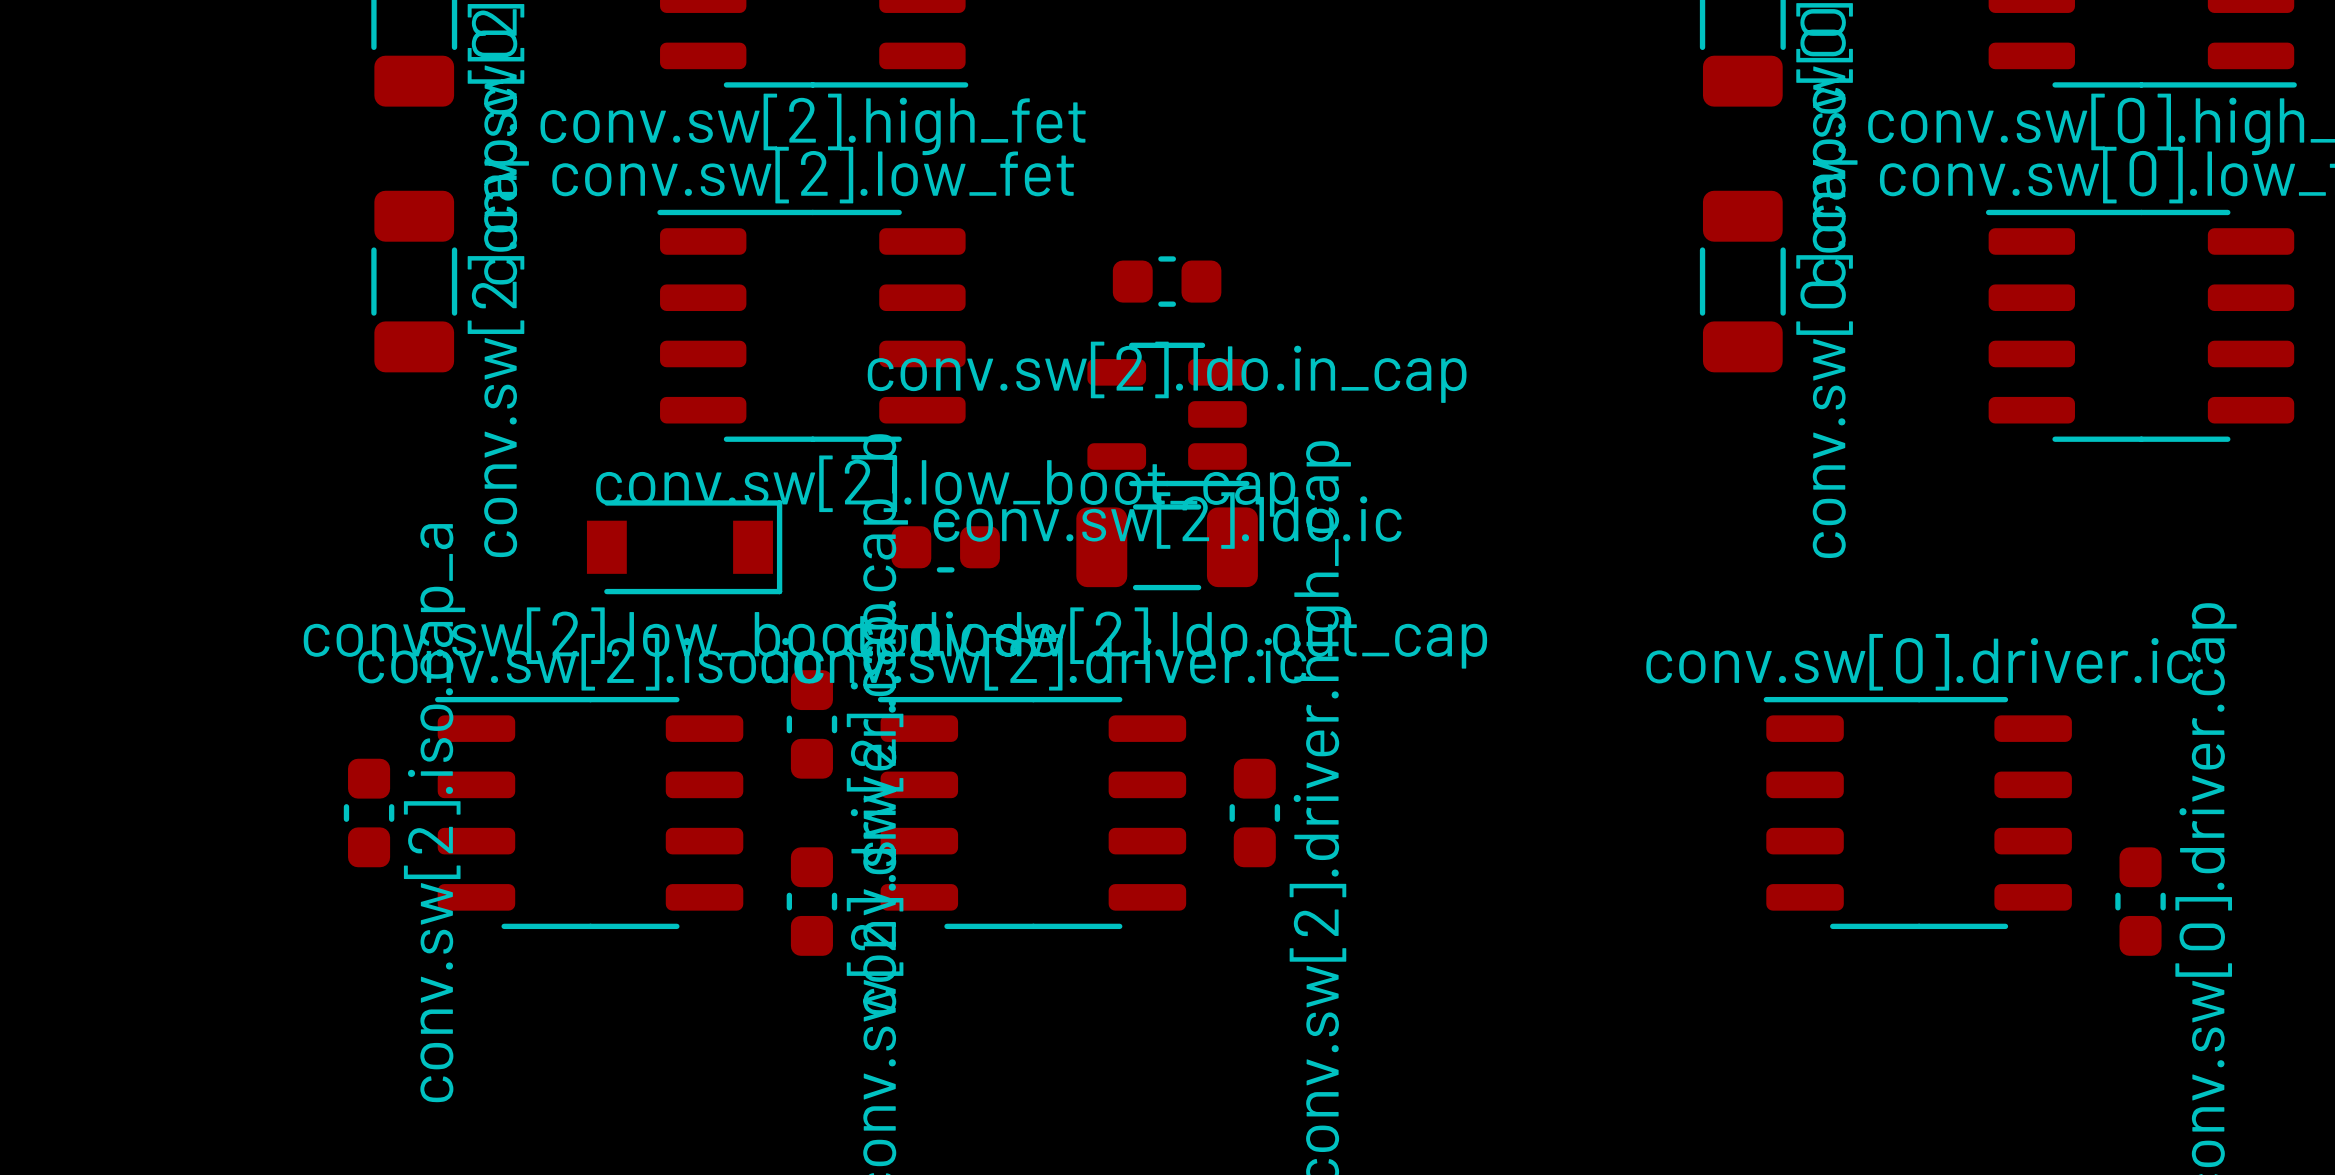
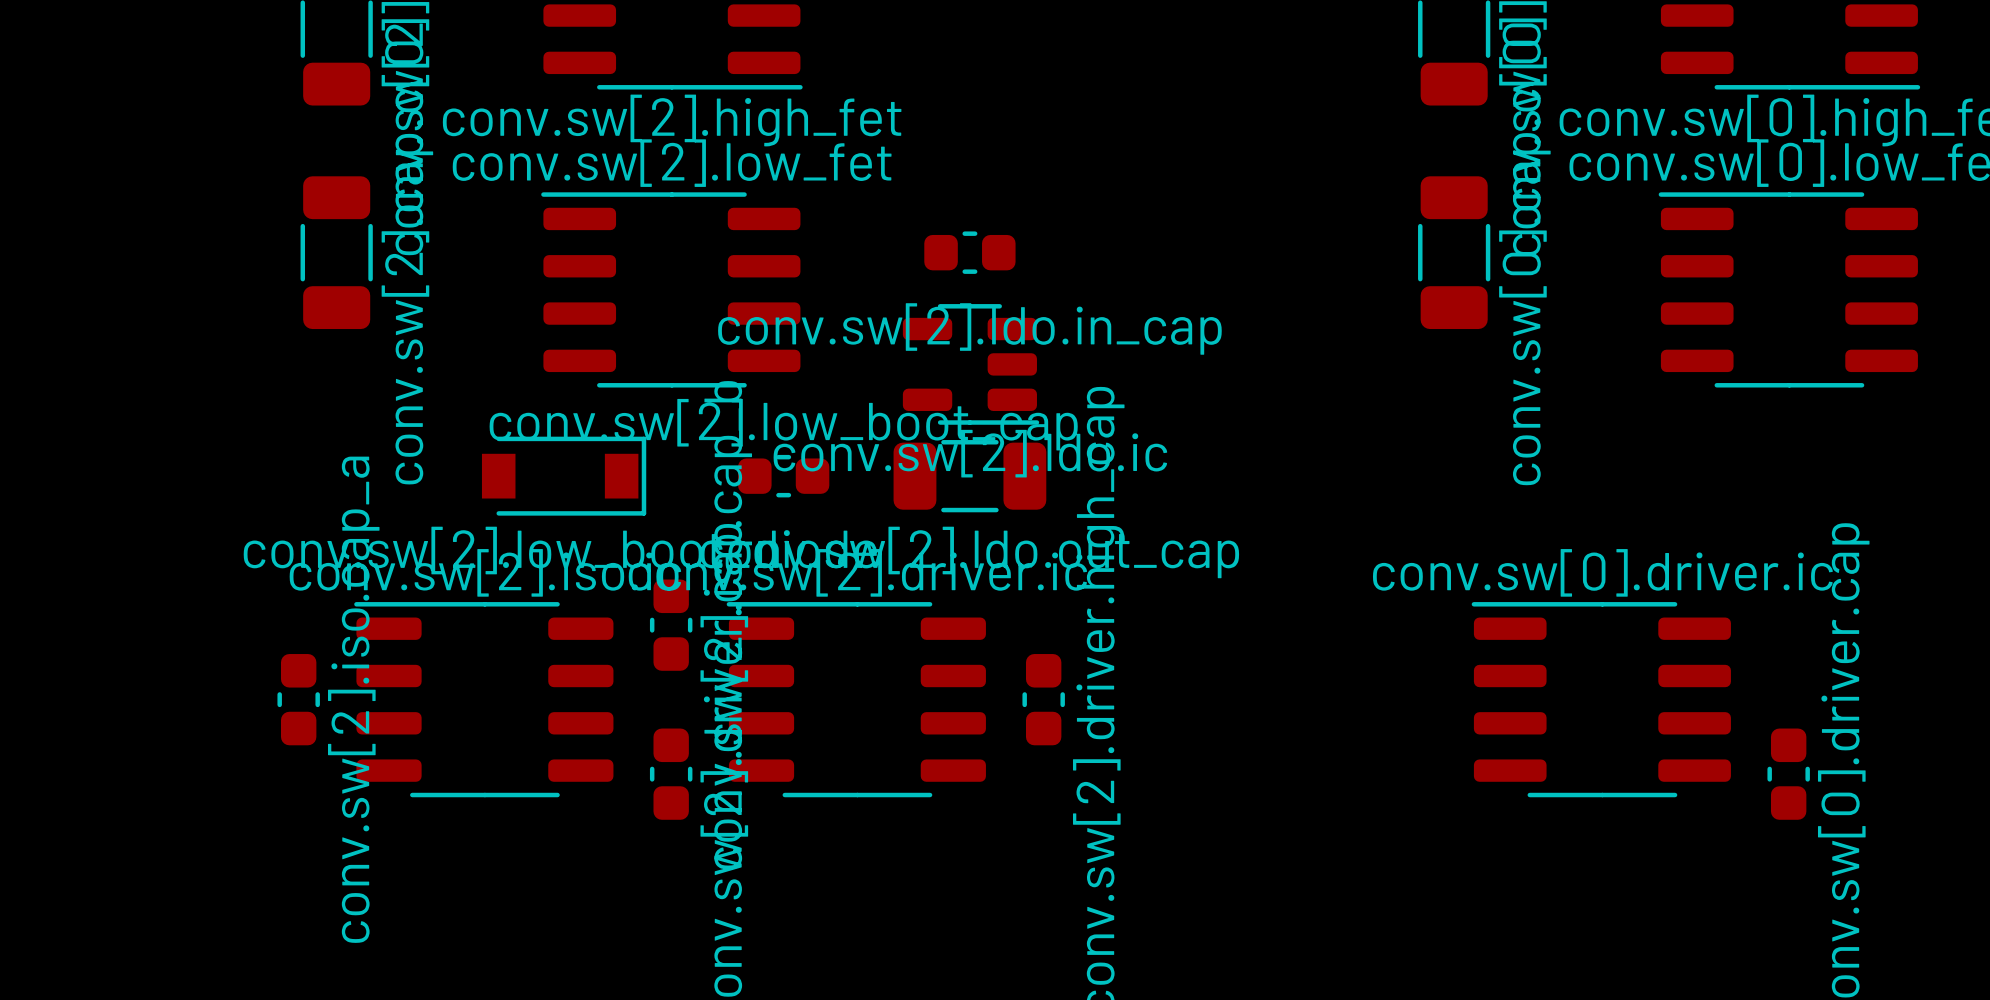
conv.sw[0].driver.ic footprint: [1763, 696, 2072, 930] -> [1471, 602, 1731, 798]

